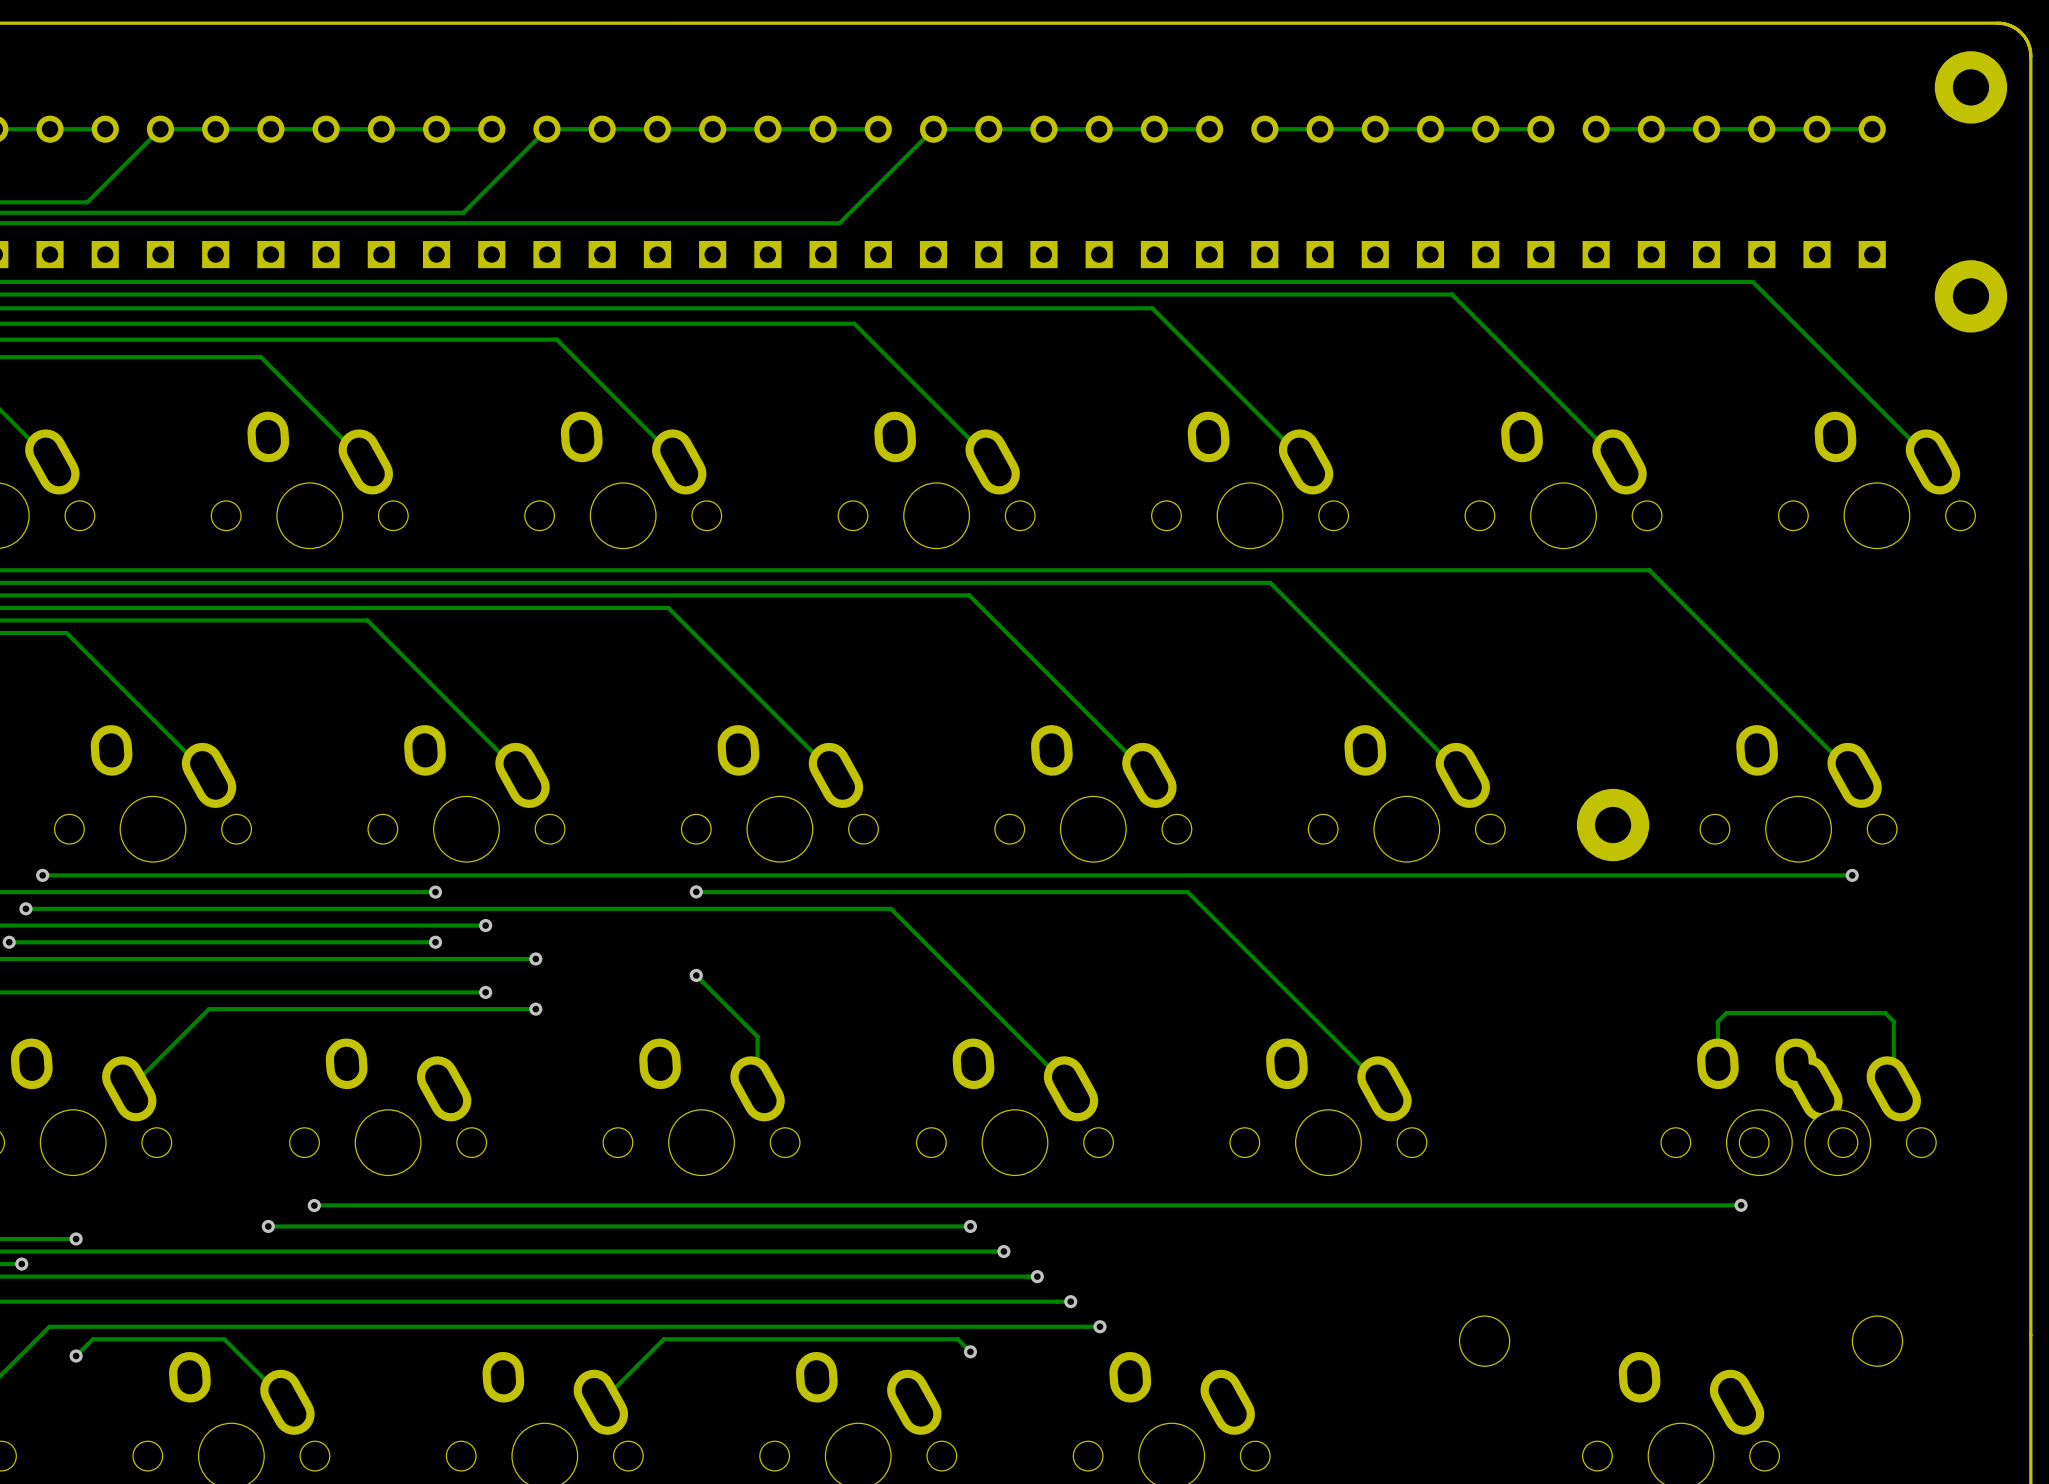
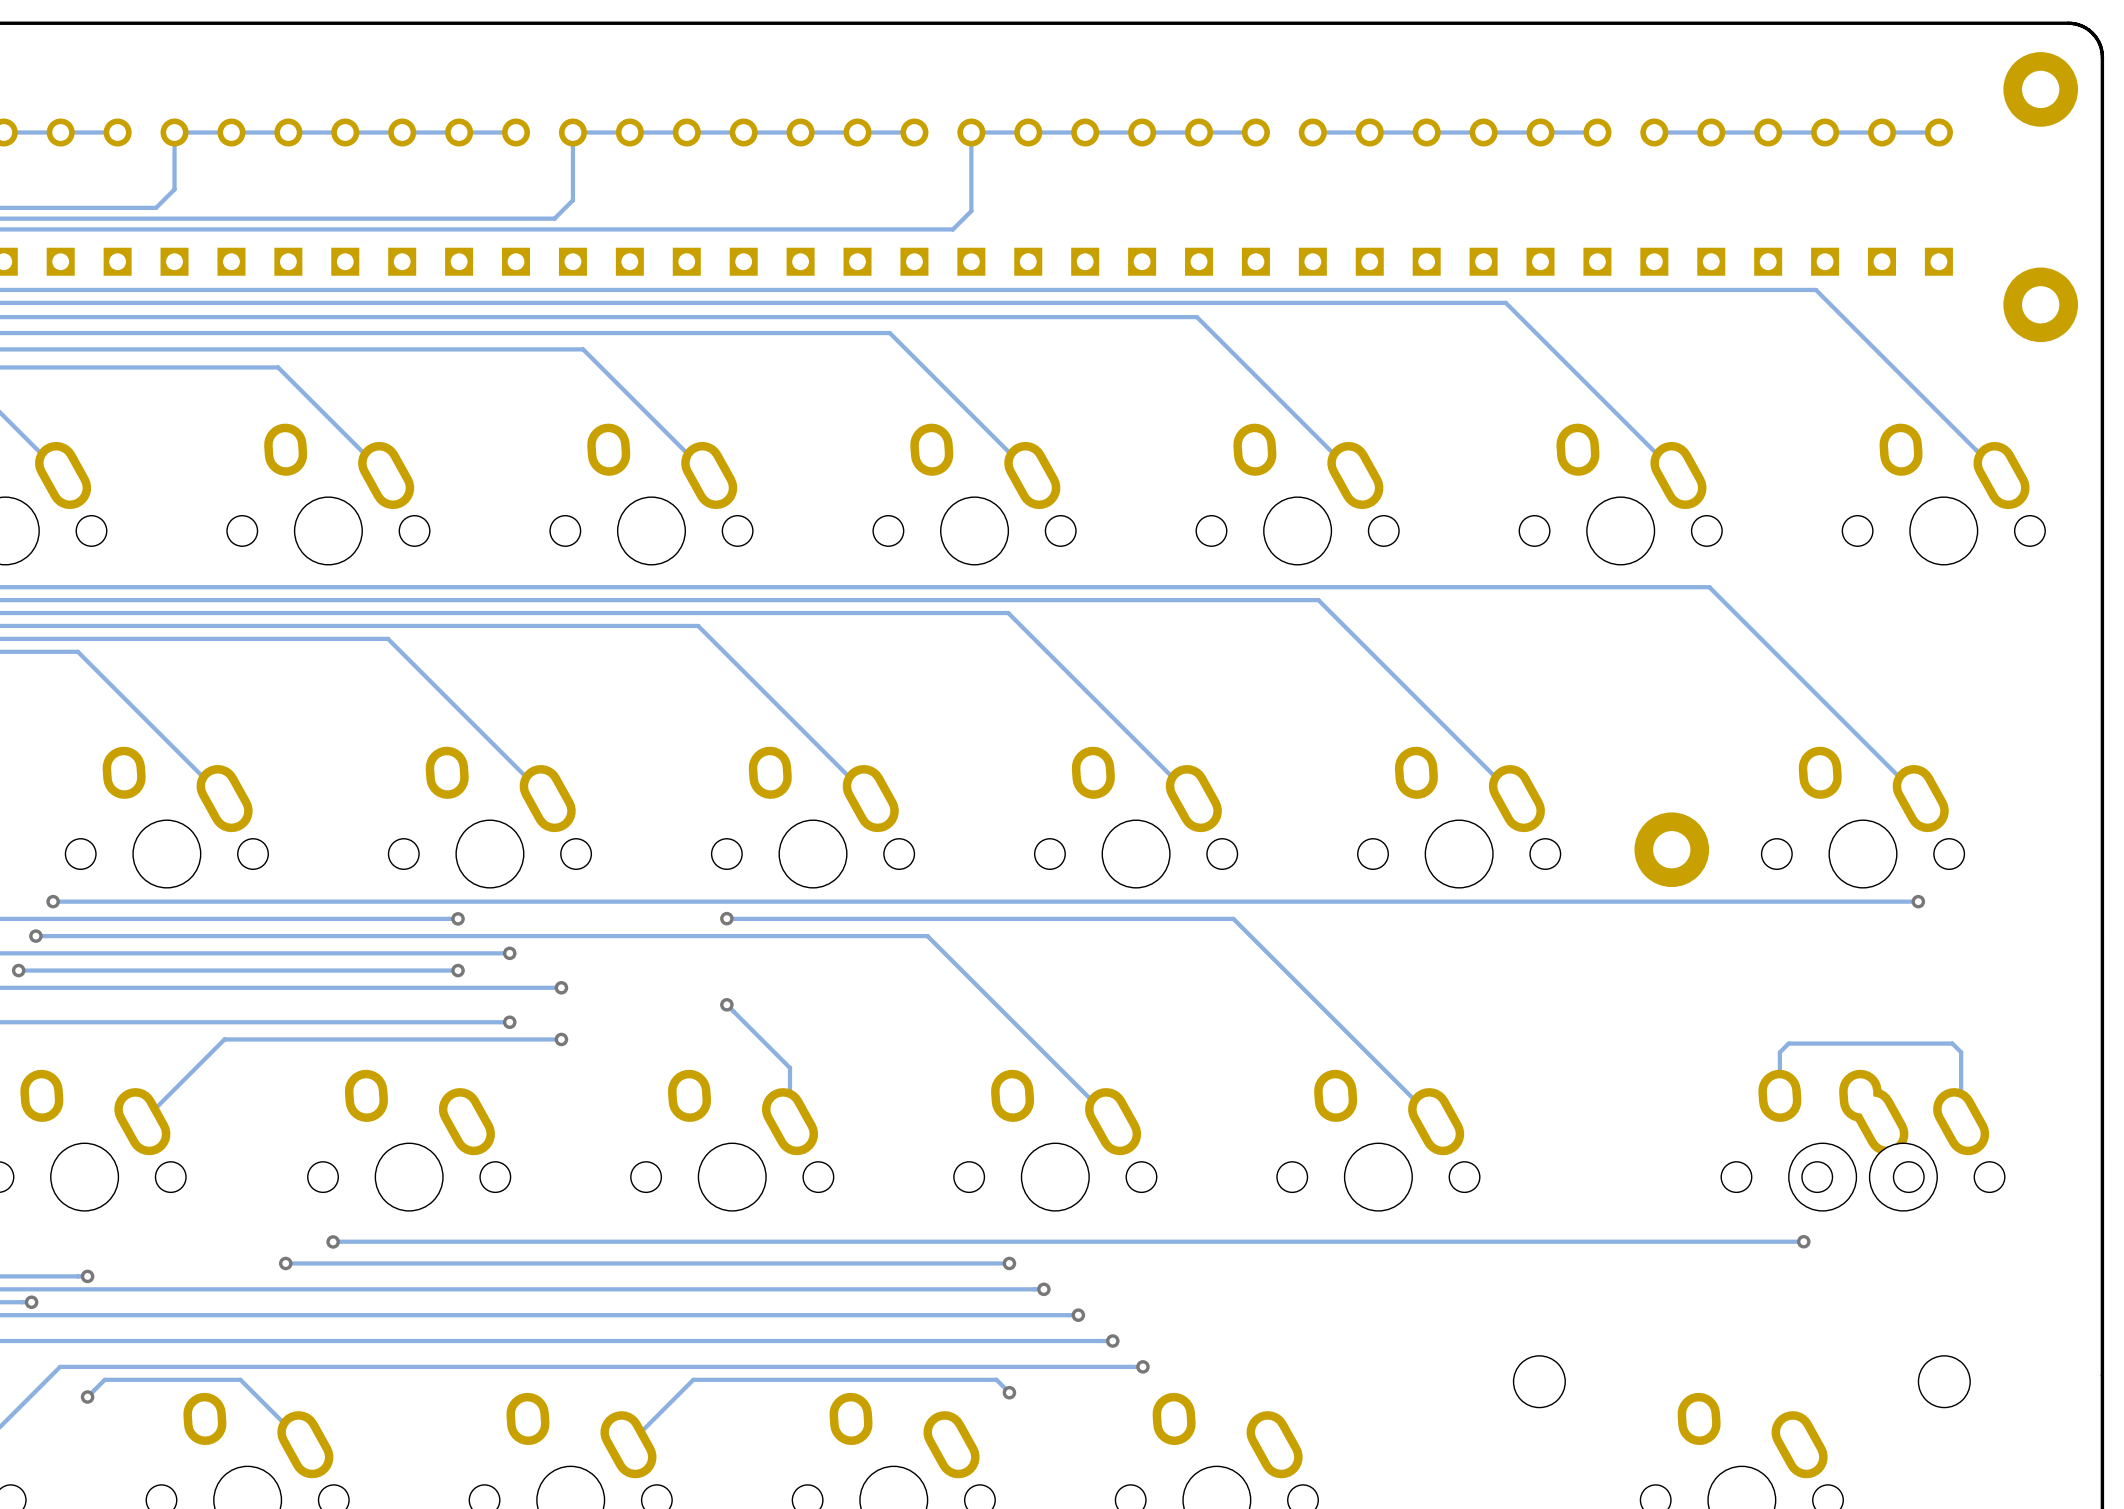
track: (160, 129) (87, 202) -> (174, 132) (174, 189) (156, 207) (99, 207)
track: (546, 129) (463, 212) -> (572, 132) (572, 200) (554, 218) (486, 218)
track: (933, 129) (839, 223) -> (971, 132) (971, 211) (953, 229) (874, 229)

